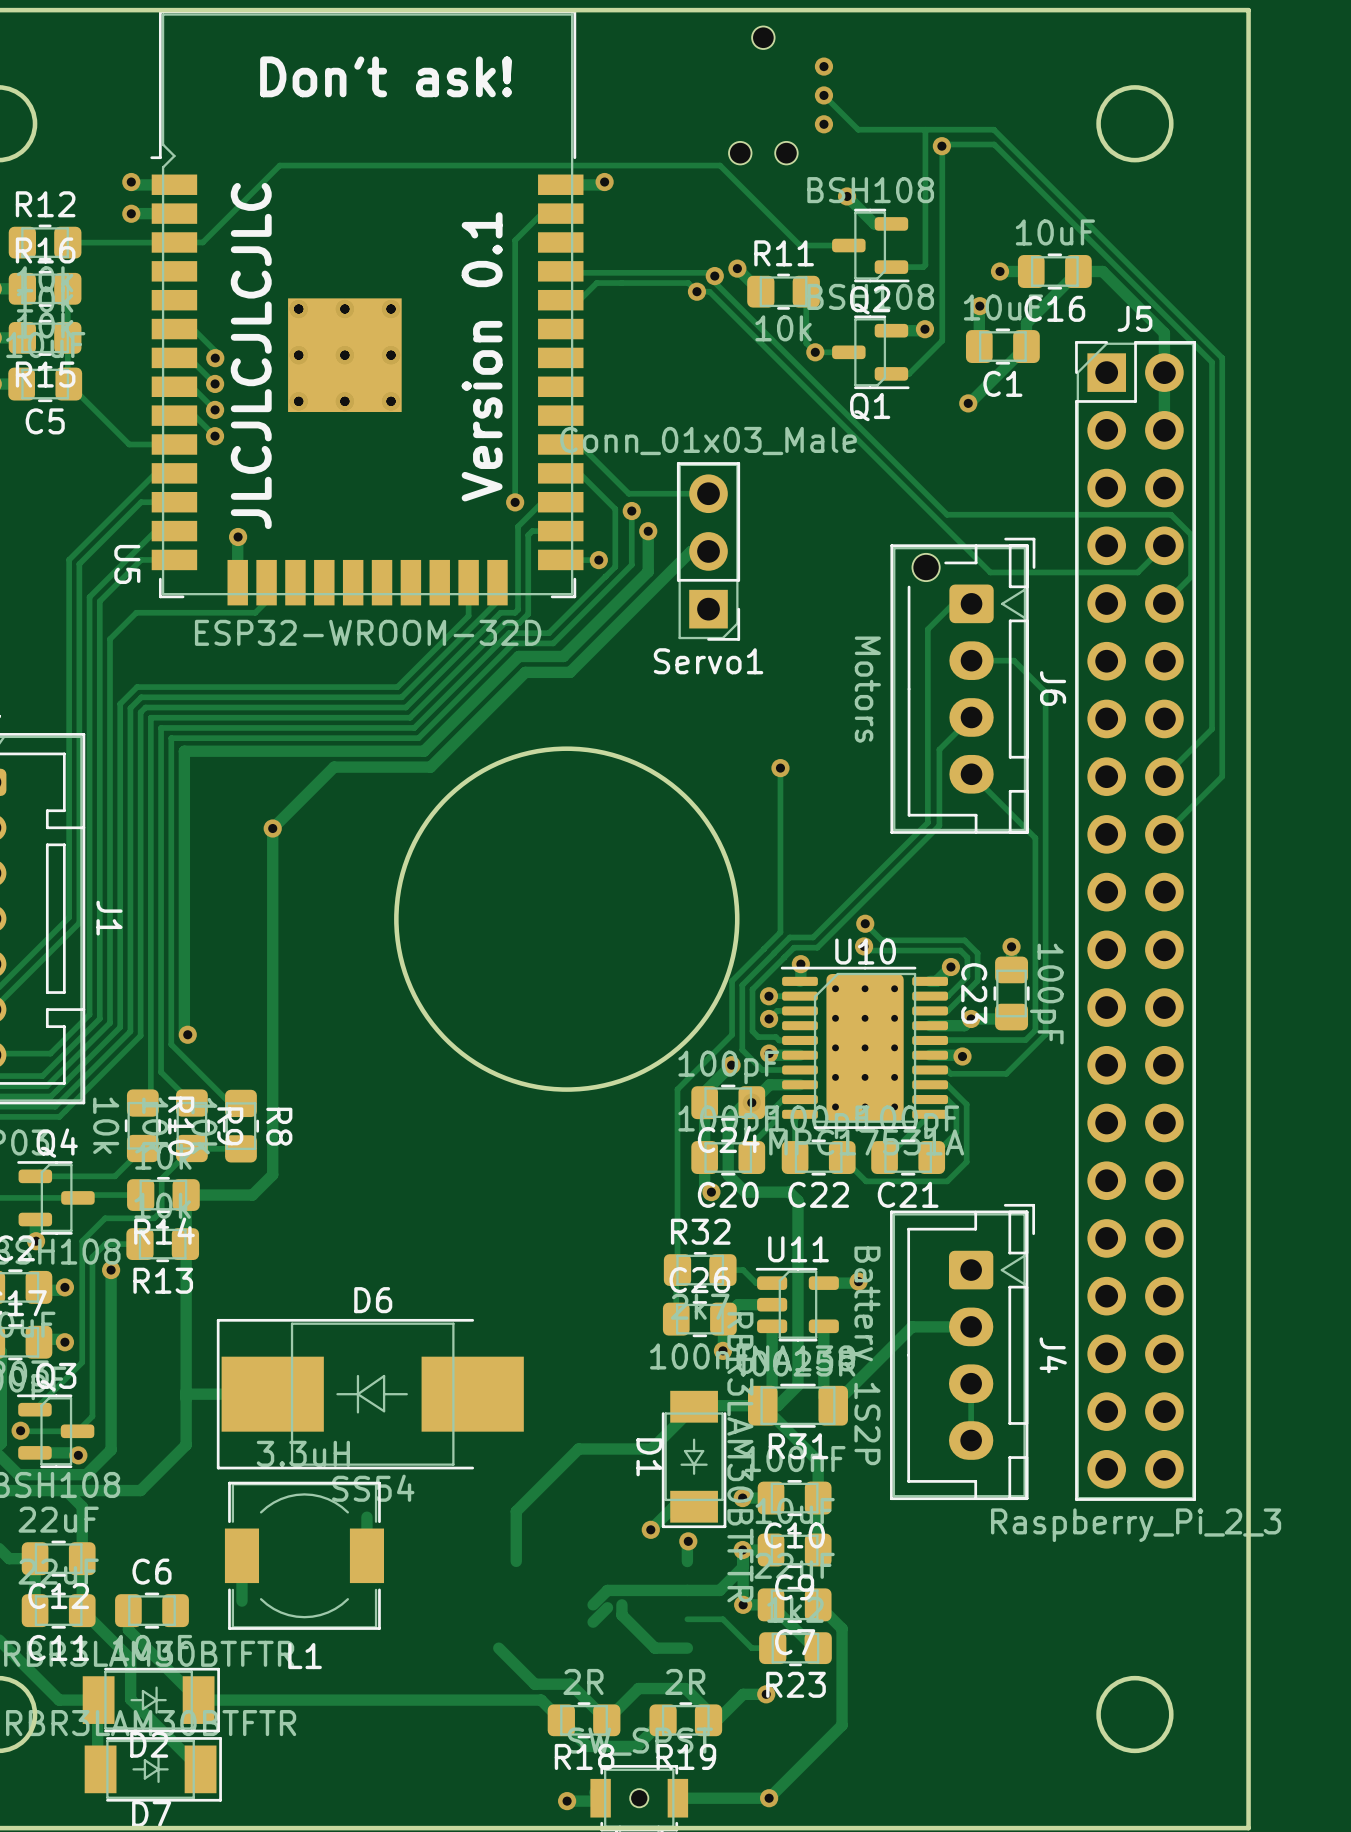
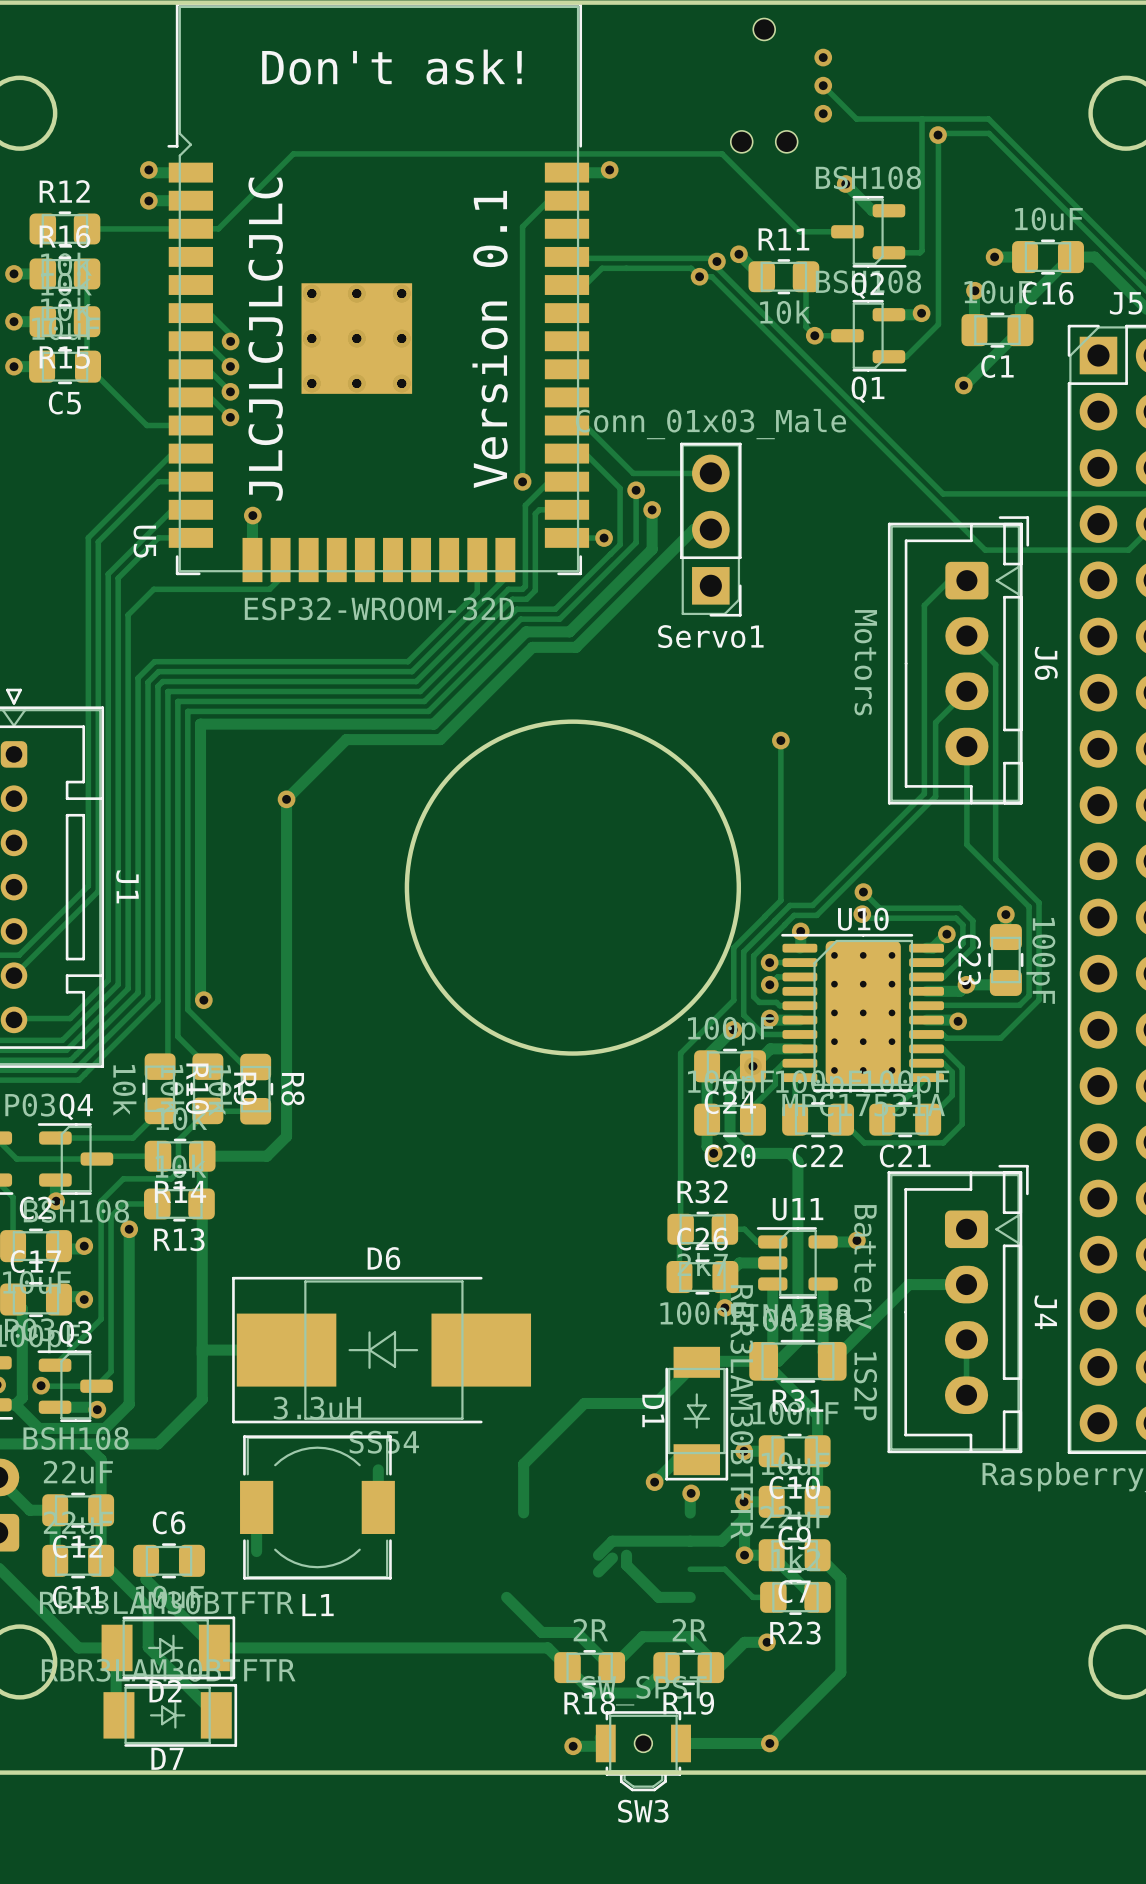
J6 footprint: [890, 537, 1036, 834] -> [887, 516, 1030, 805]
track: (971, 660) (1013, 660) (1045, 692) (1045, 934) -> (966, 635) (995, 664) (995, 859) (1039, 902)
track: (971, 774) (1035, 838) (1035, 938) -> (966, 746) (966, 844) (1029, 906)

